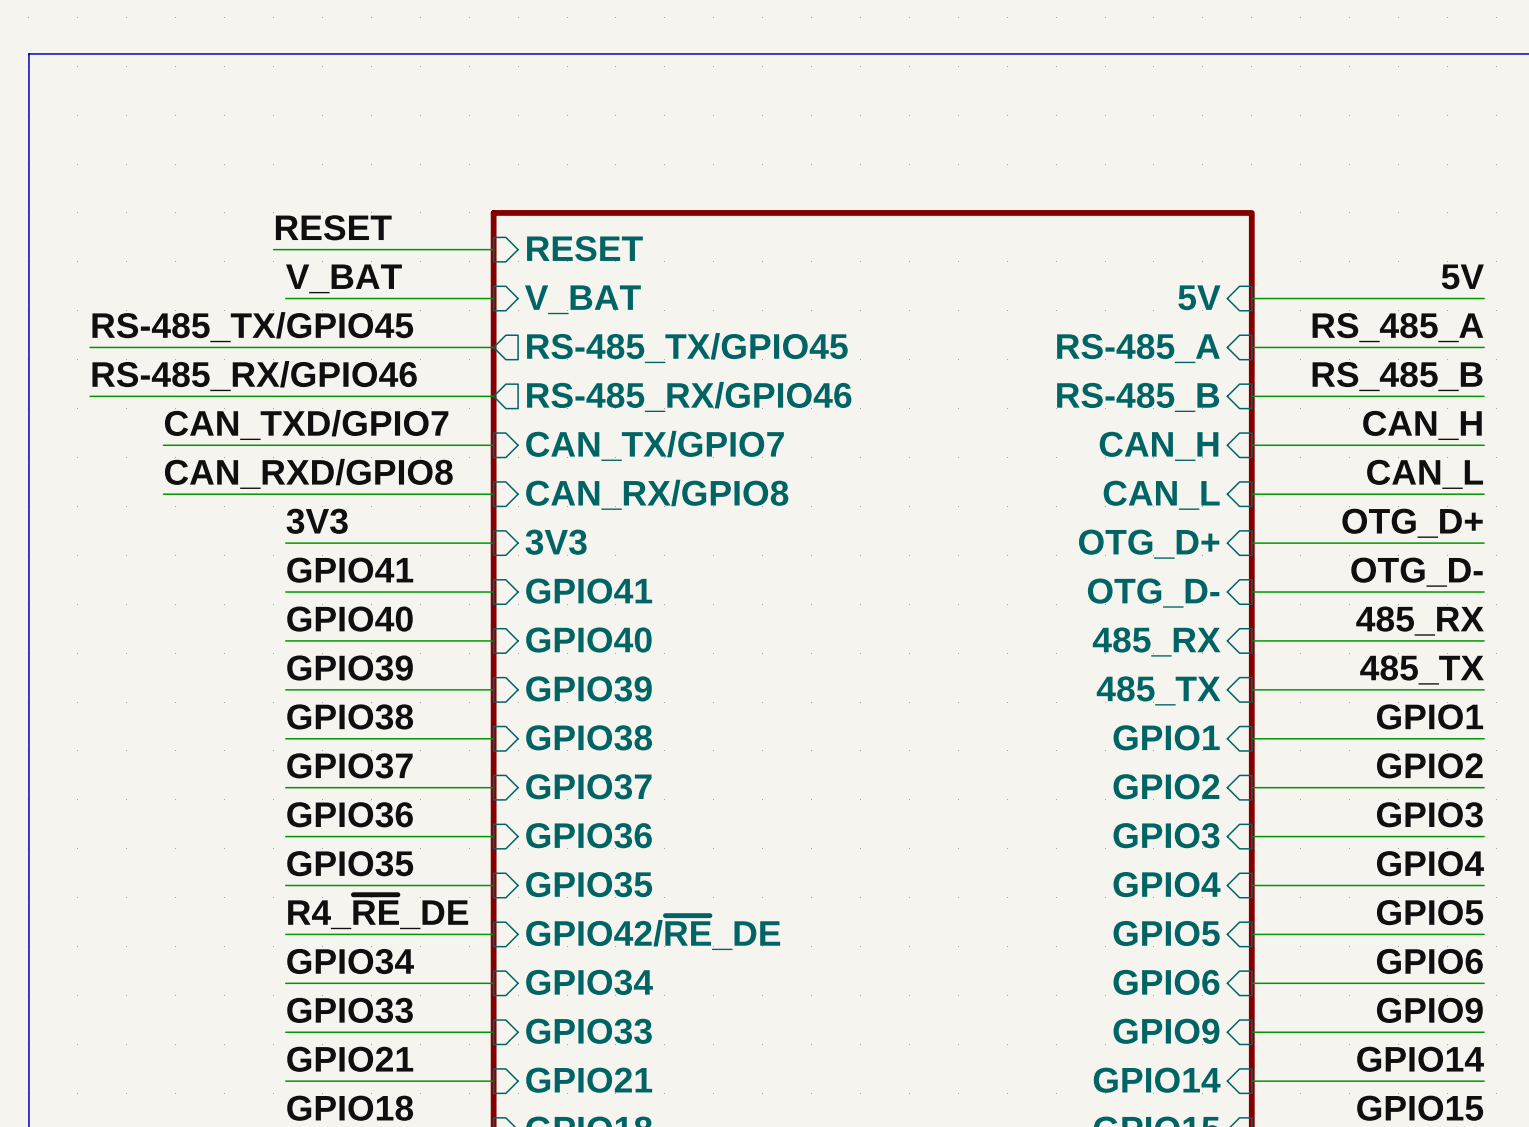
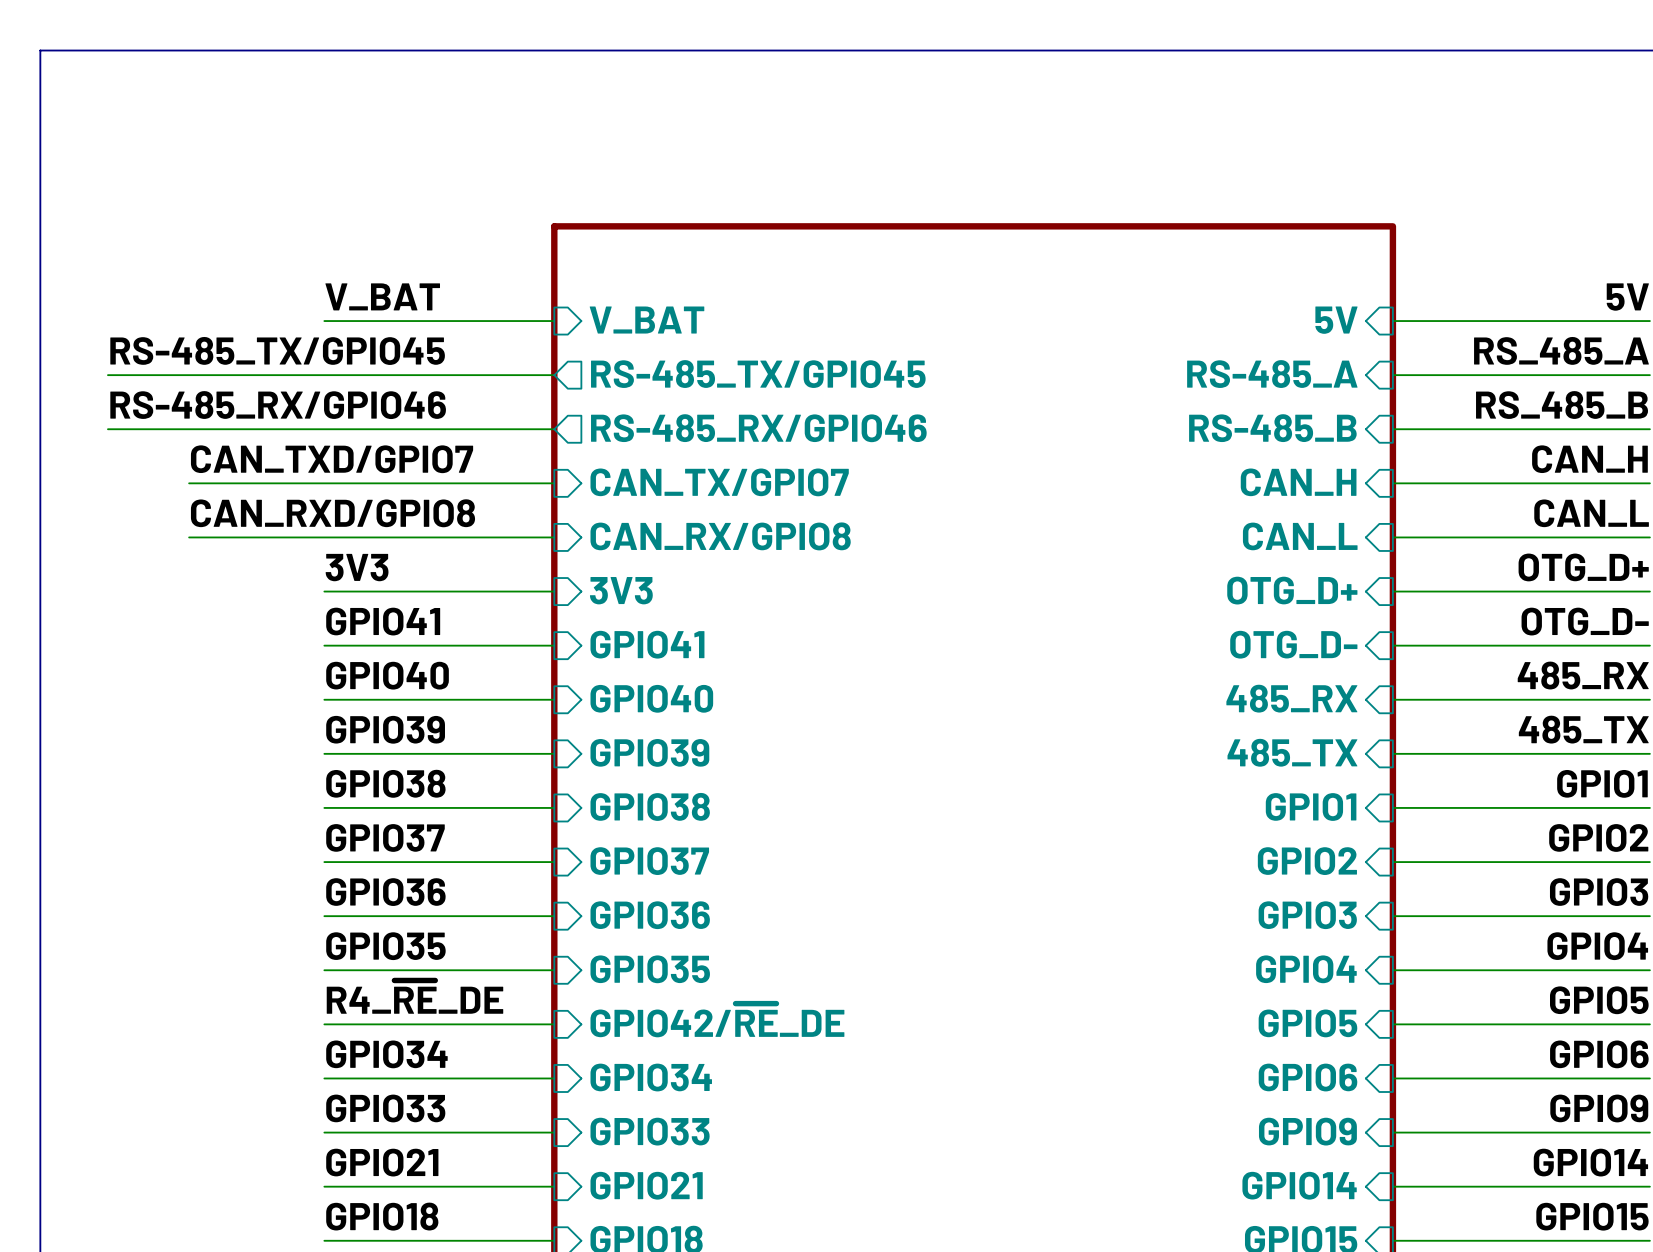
label: RESET (333, 227) -> none
sheet pin: RESET (584, 248) -> none
wire: (273, 249) (493, 249) -> none

